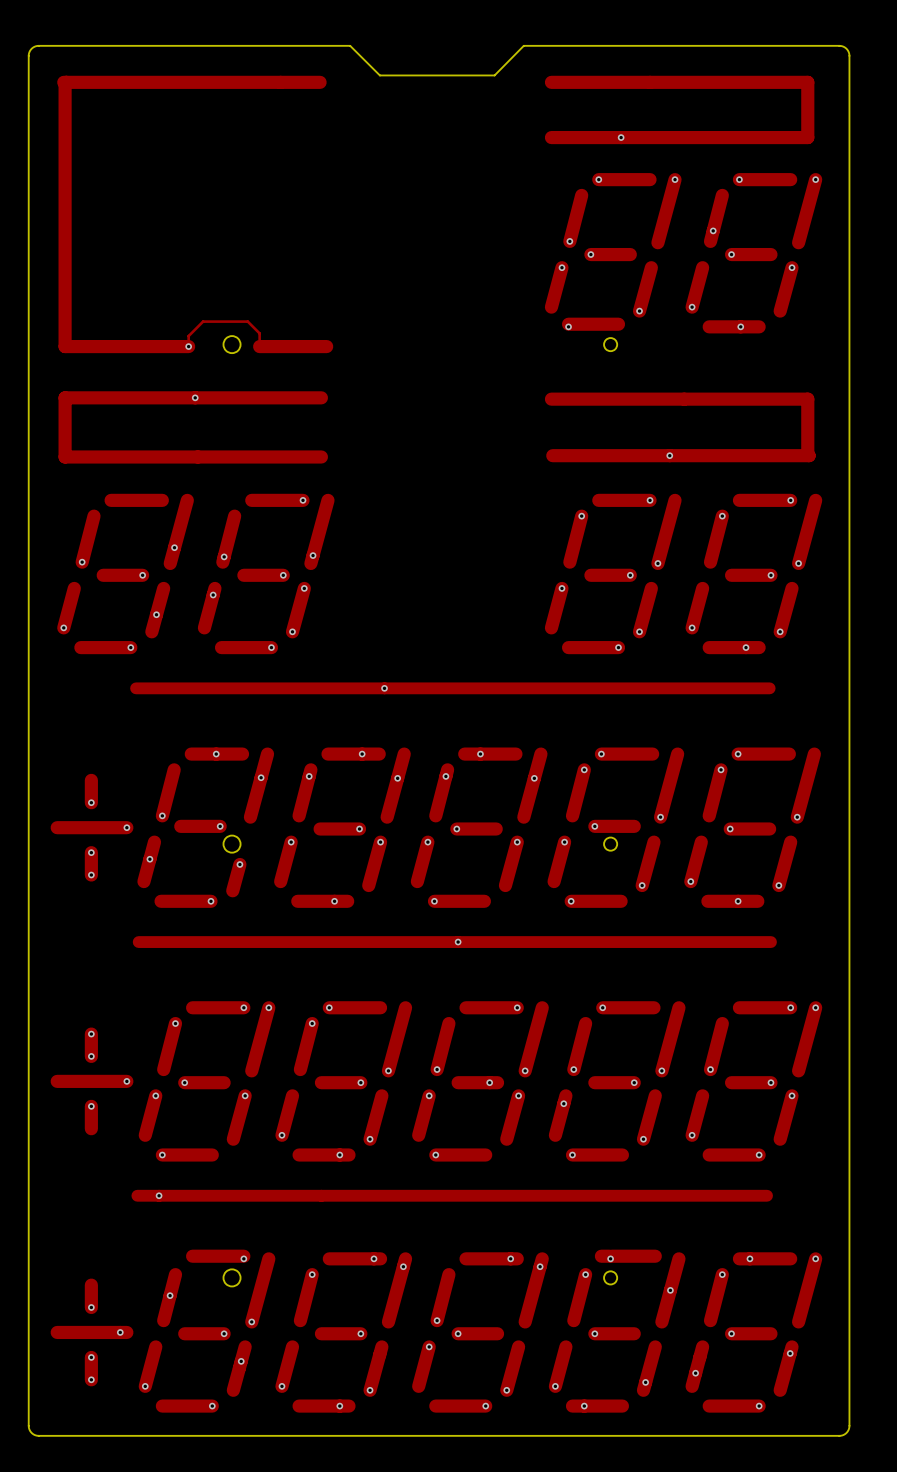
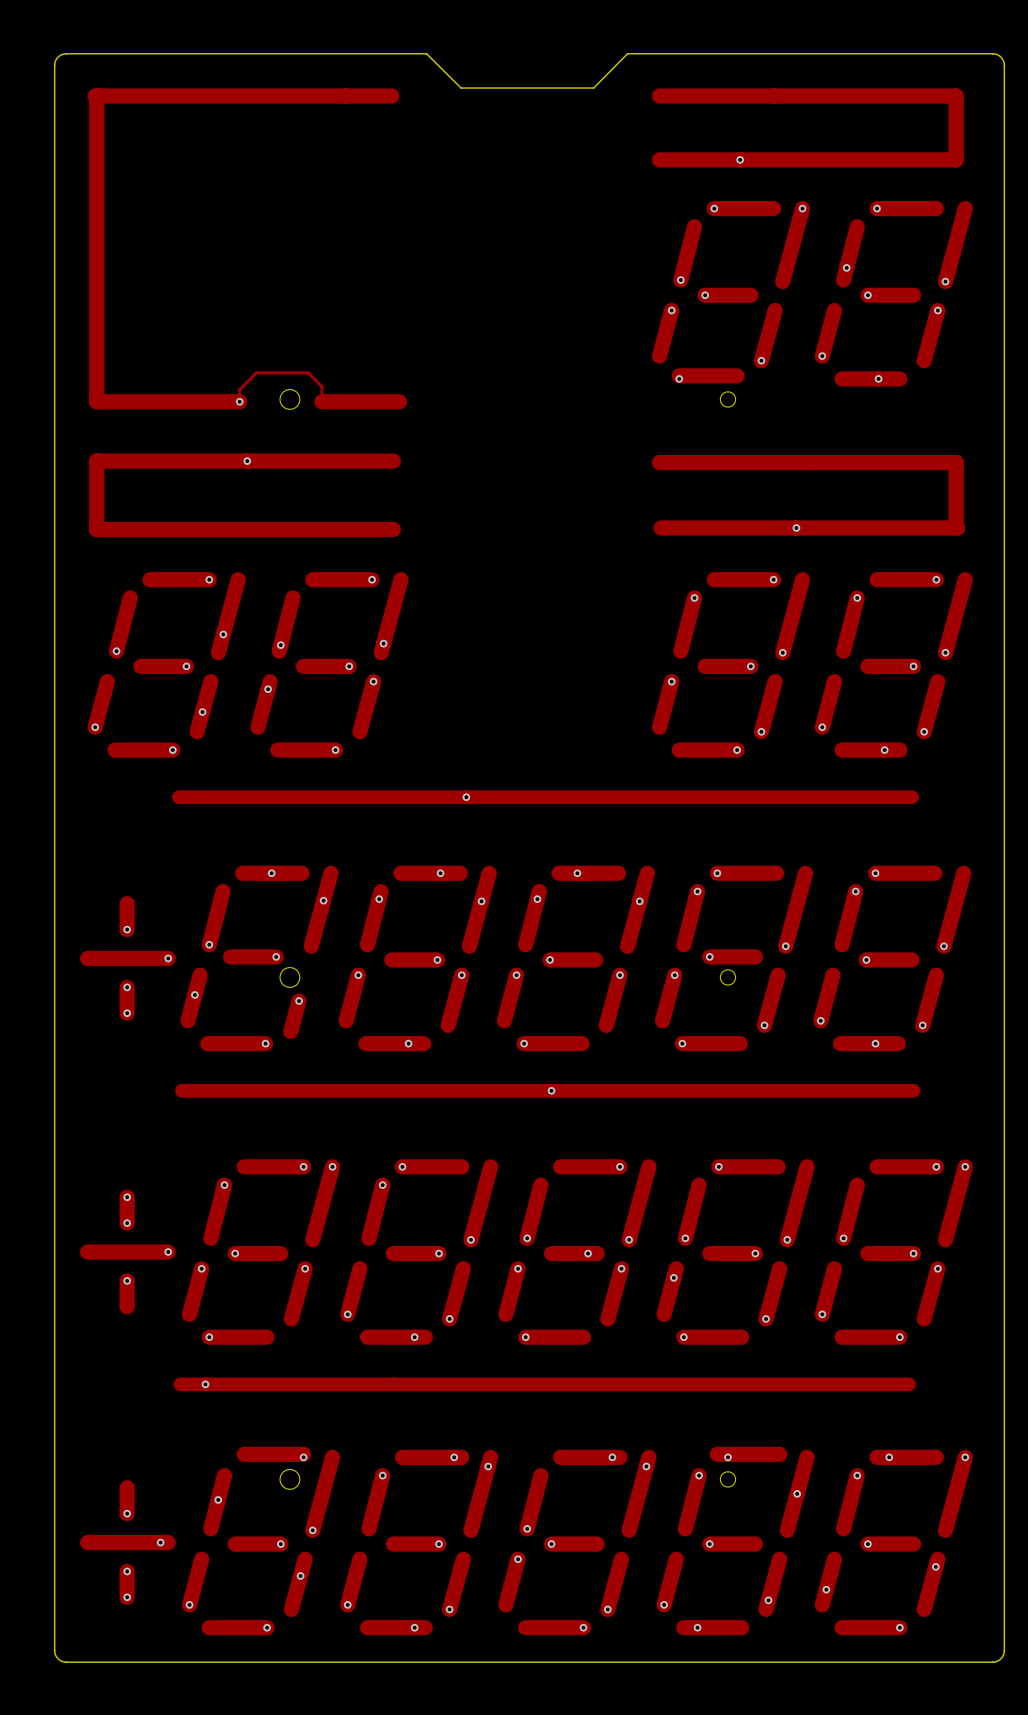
via position: (815, 179) -> (945, 281)
via: none -> (209, 579)
via: (292, 631) -> none

